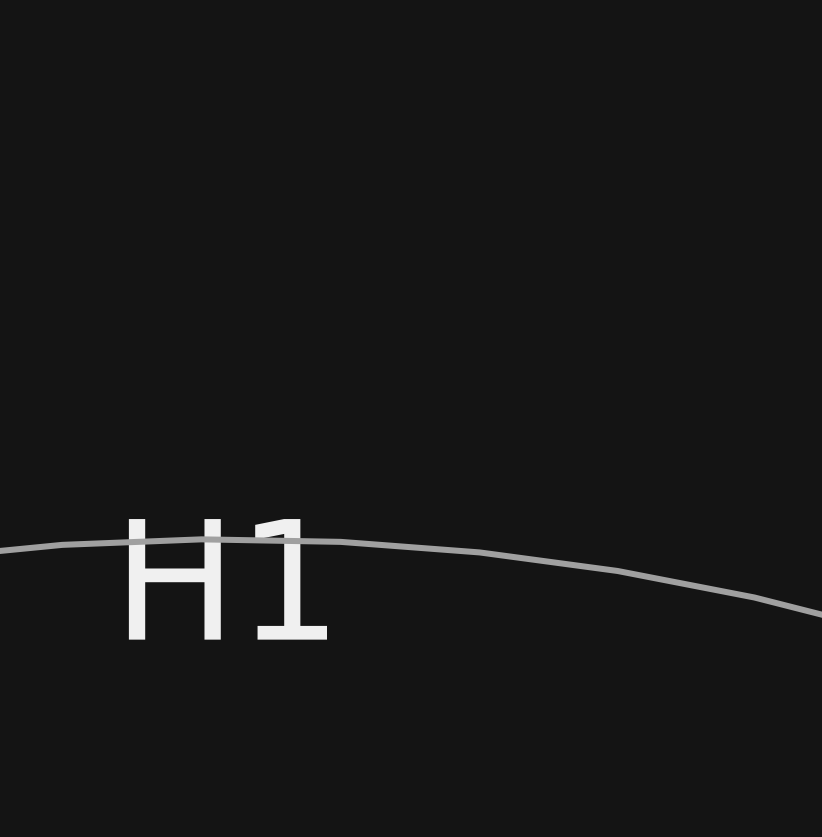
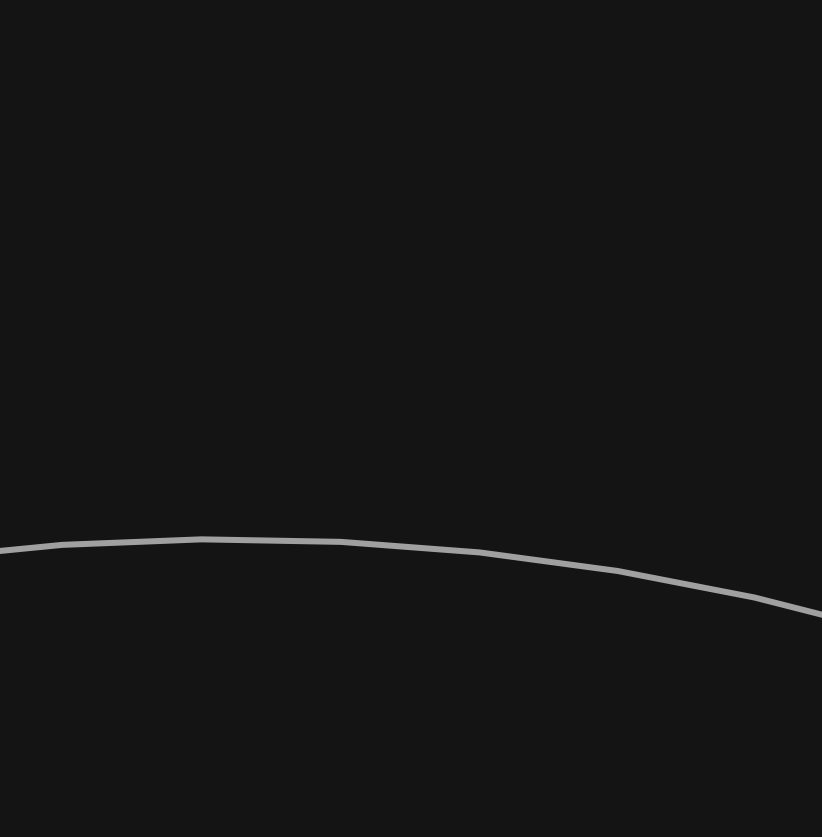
H1 name: H1 (227, 579) -> none

